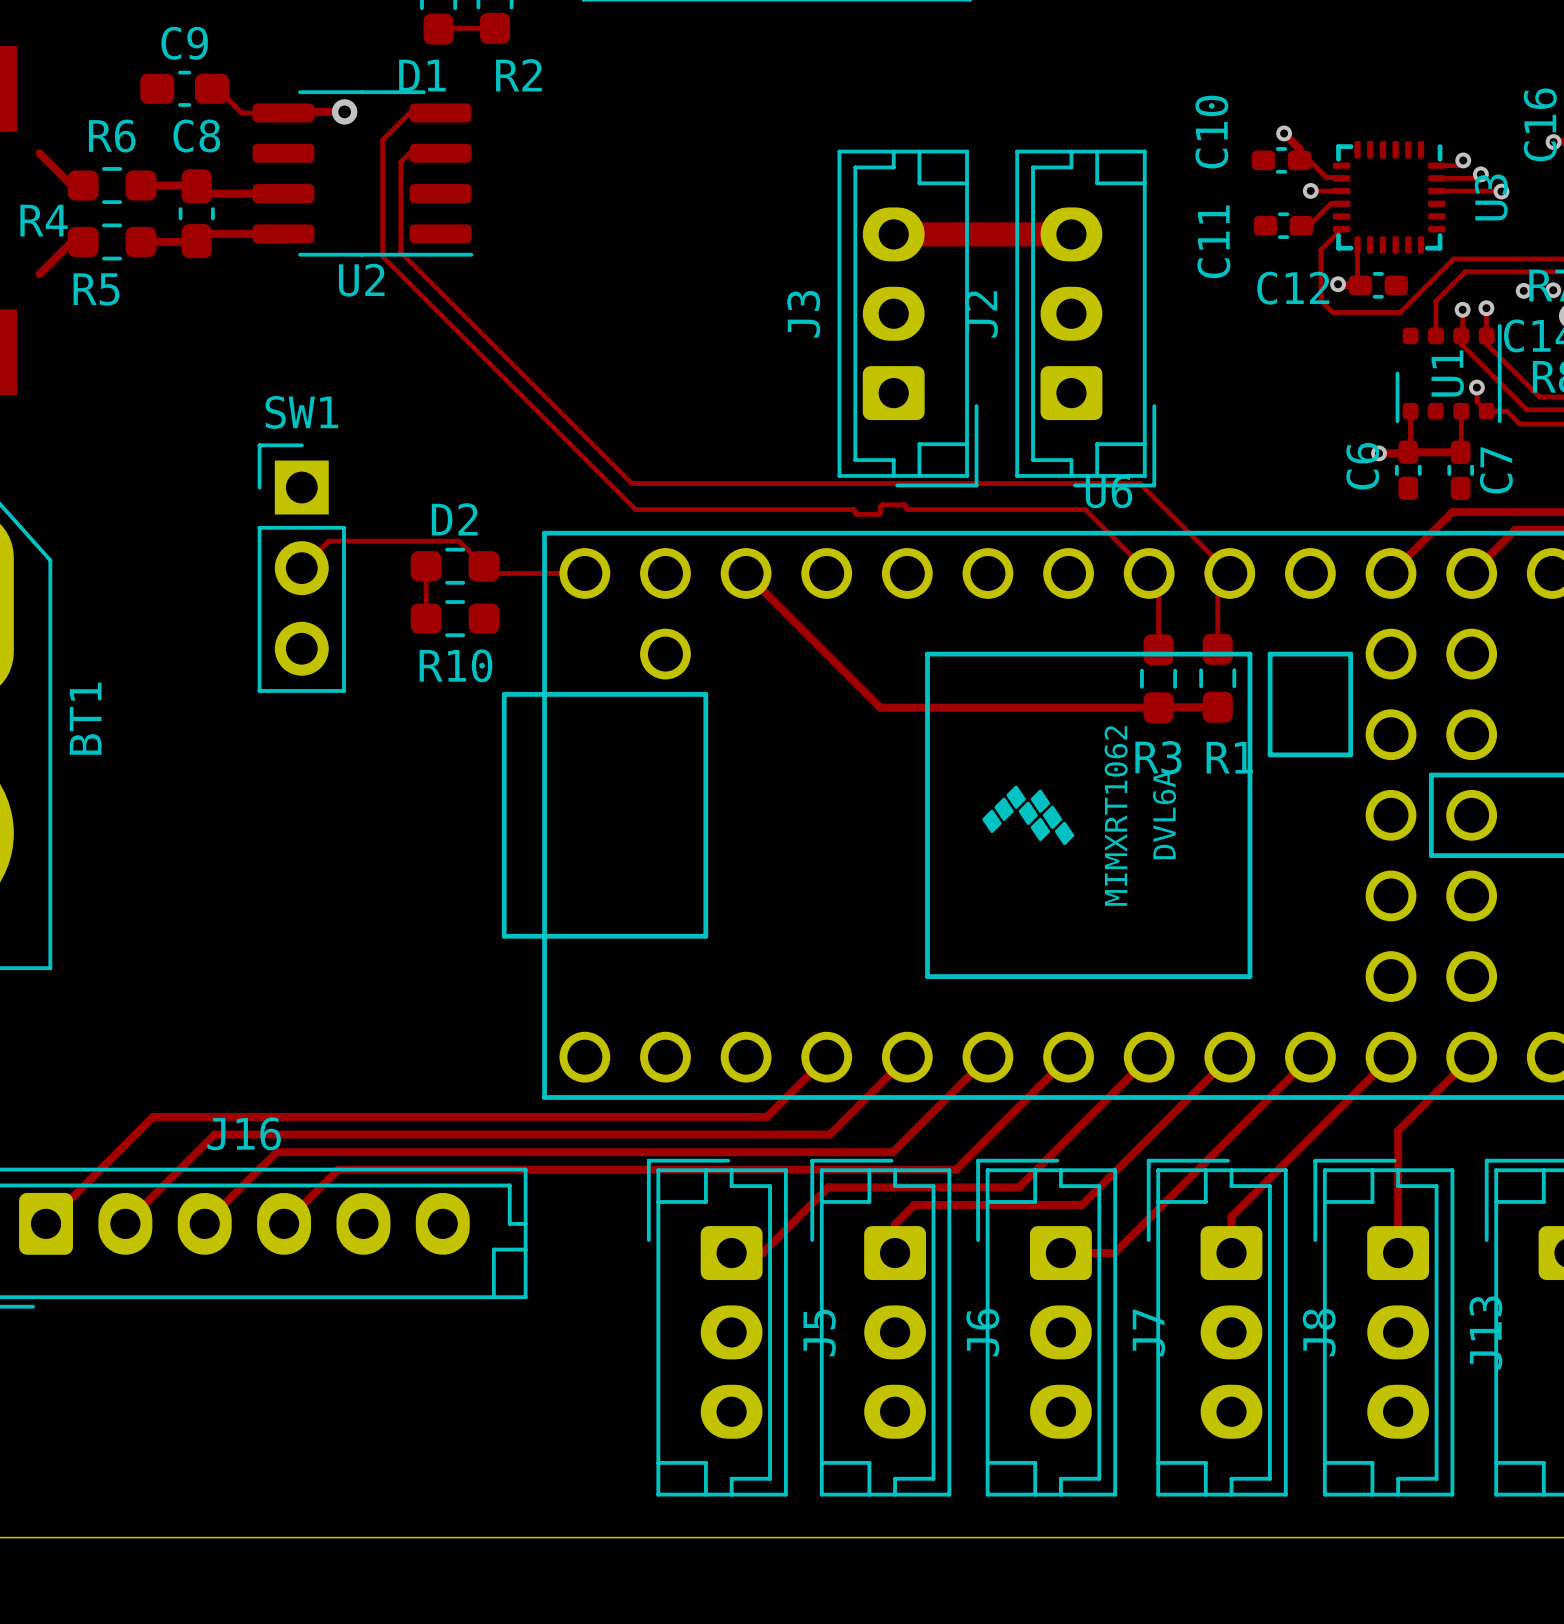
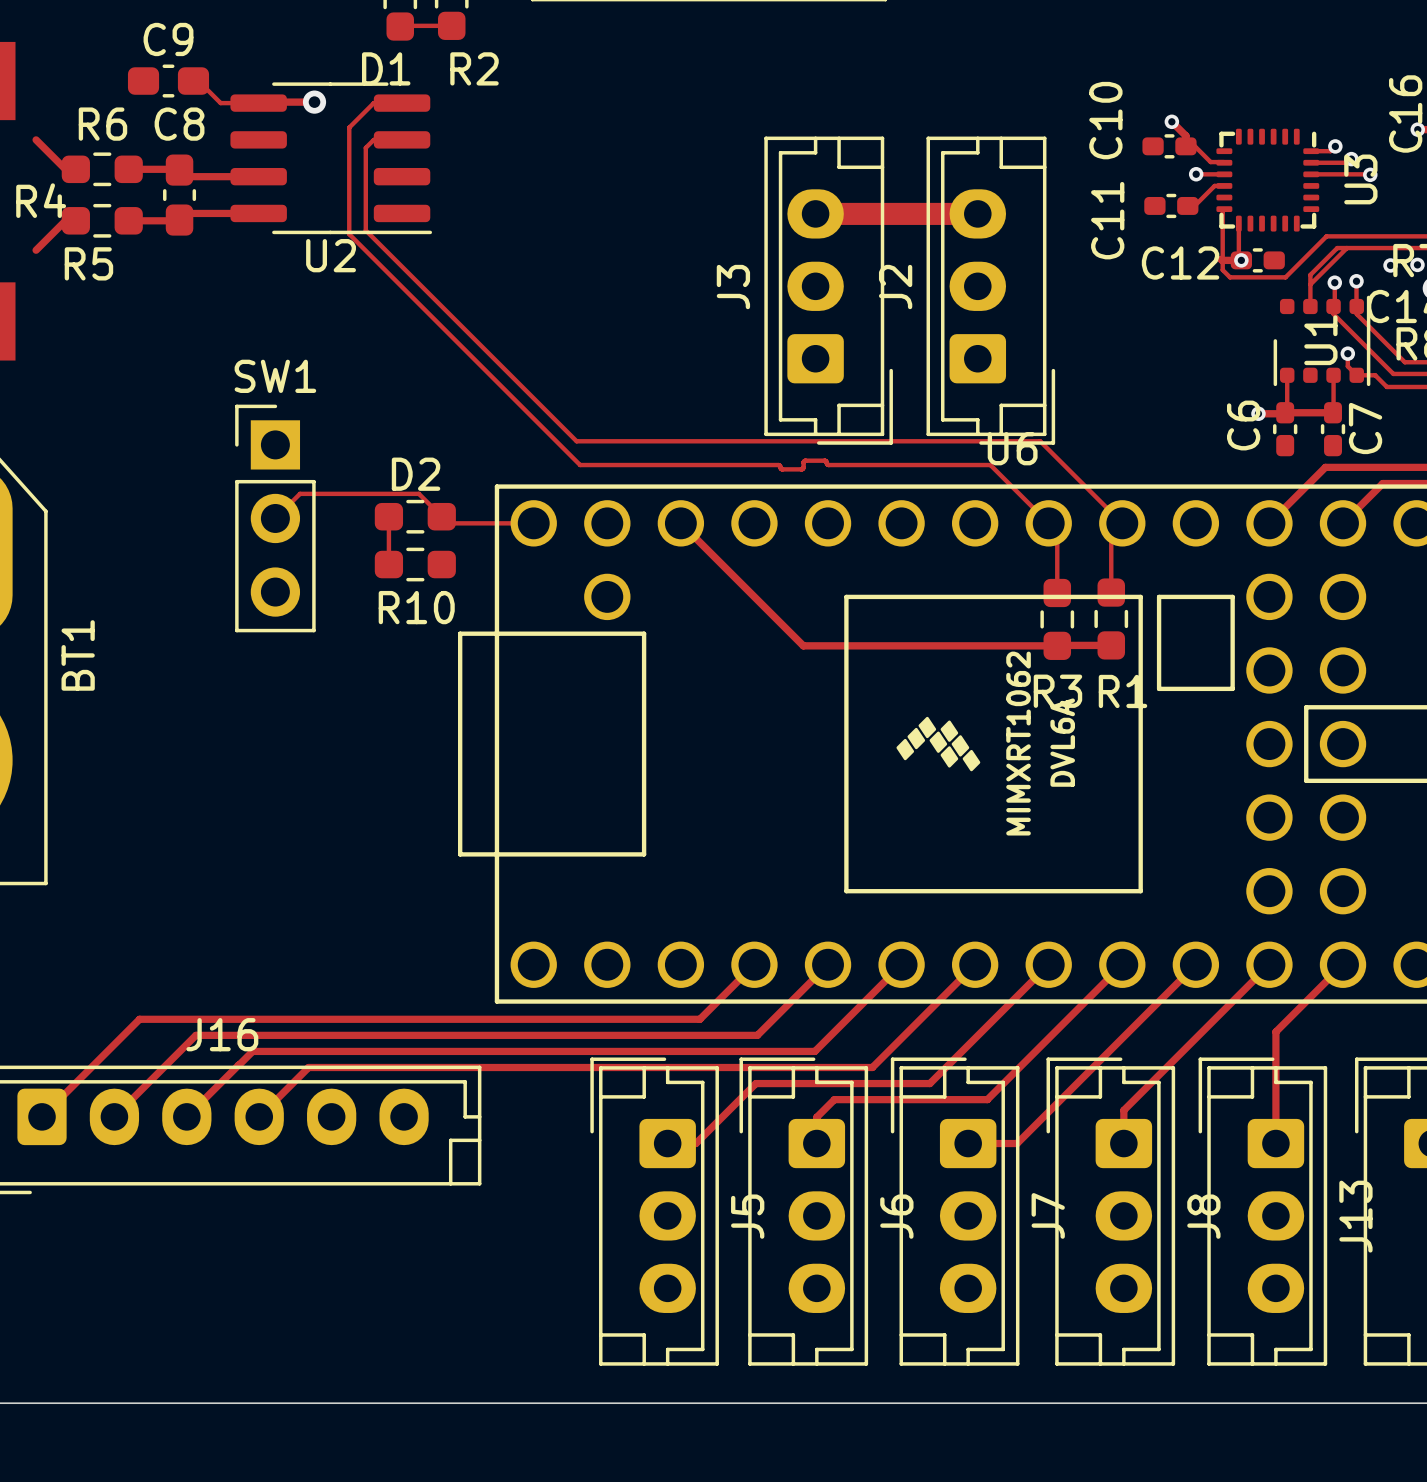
track: (1339, 230) (1320, 249) (1320, 300) (1332, 312) (1400, 312) (1408, 303) -> (1222, 210) (1222, 270) (1230, 277) (1285, 277)
track: none -> (1346, 248) (1310, 284)
via position: (1338, 284) -> (1241, 260)

